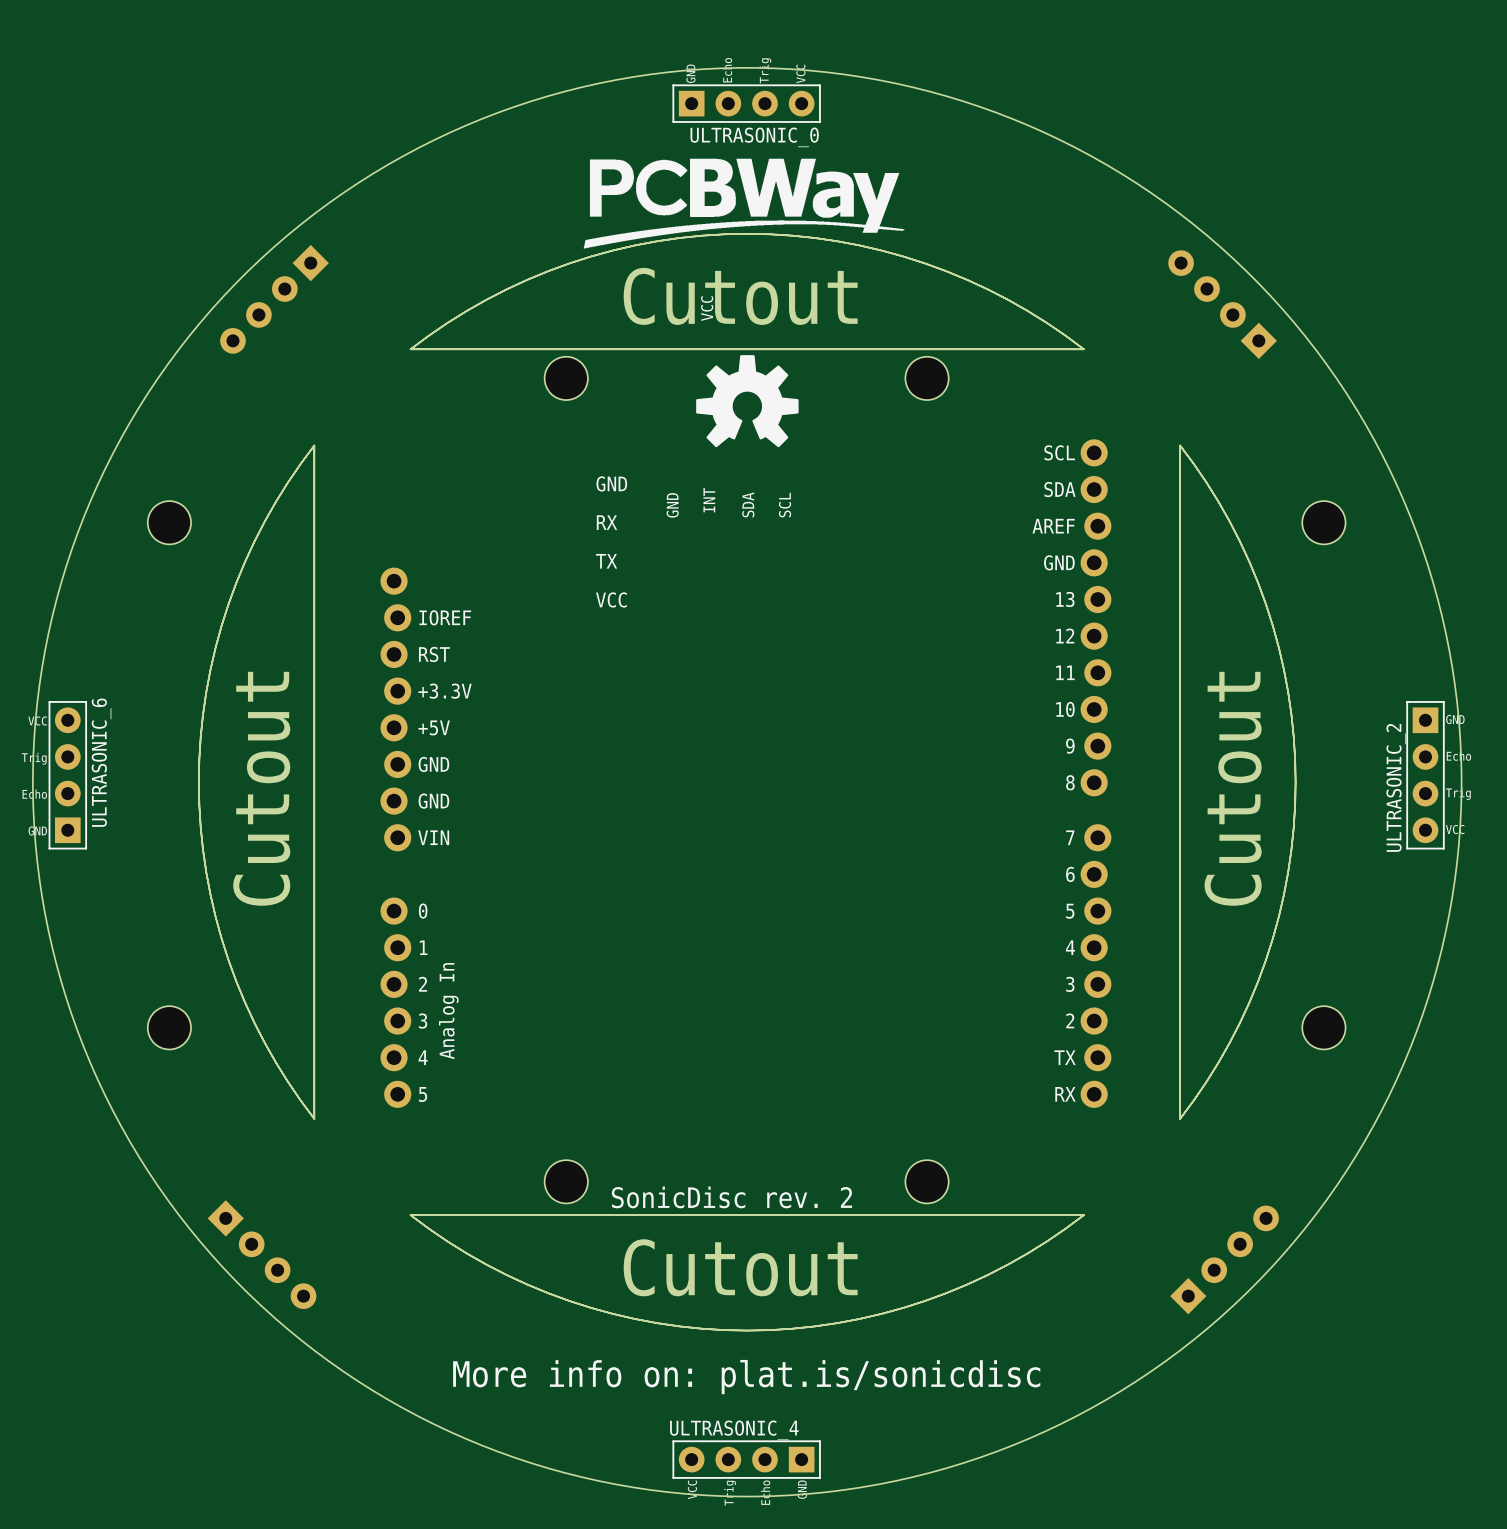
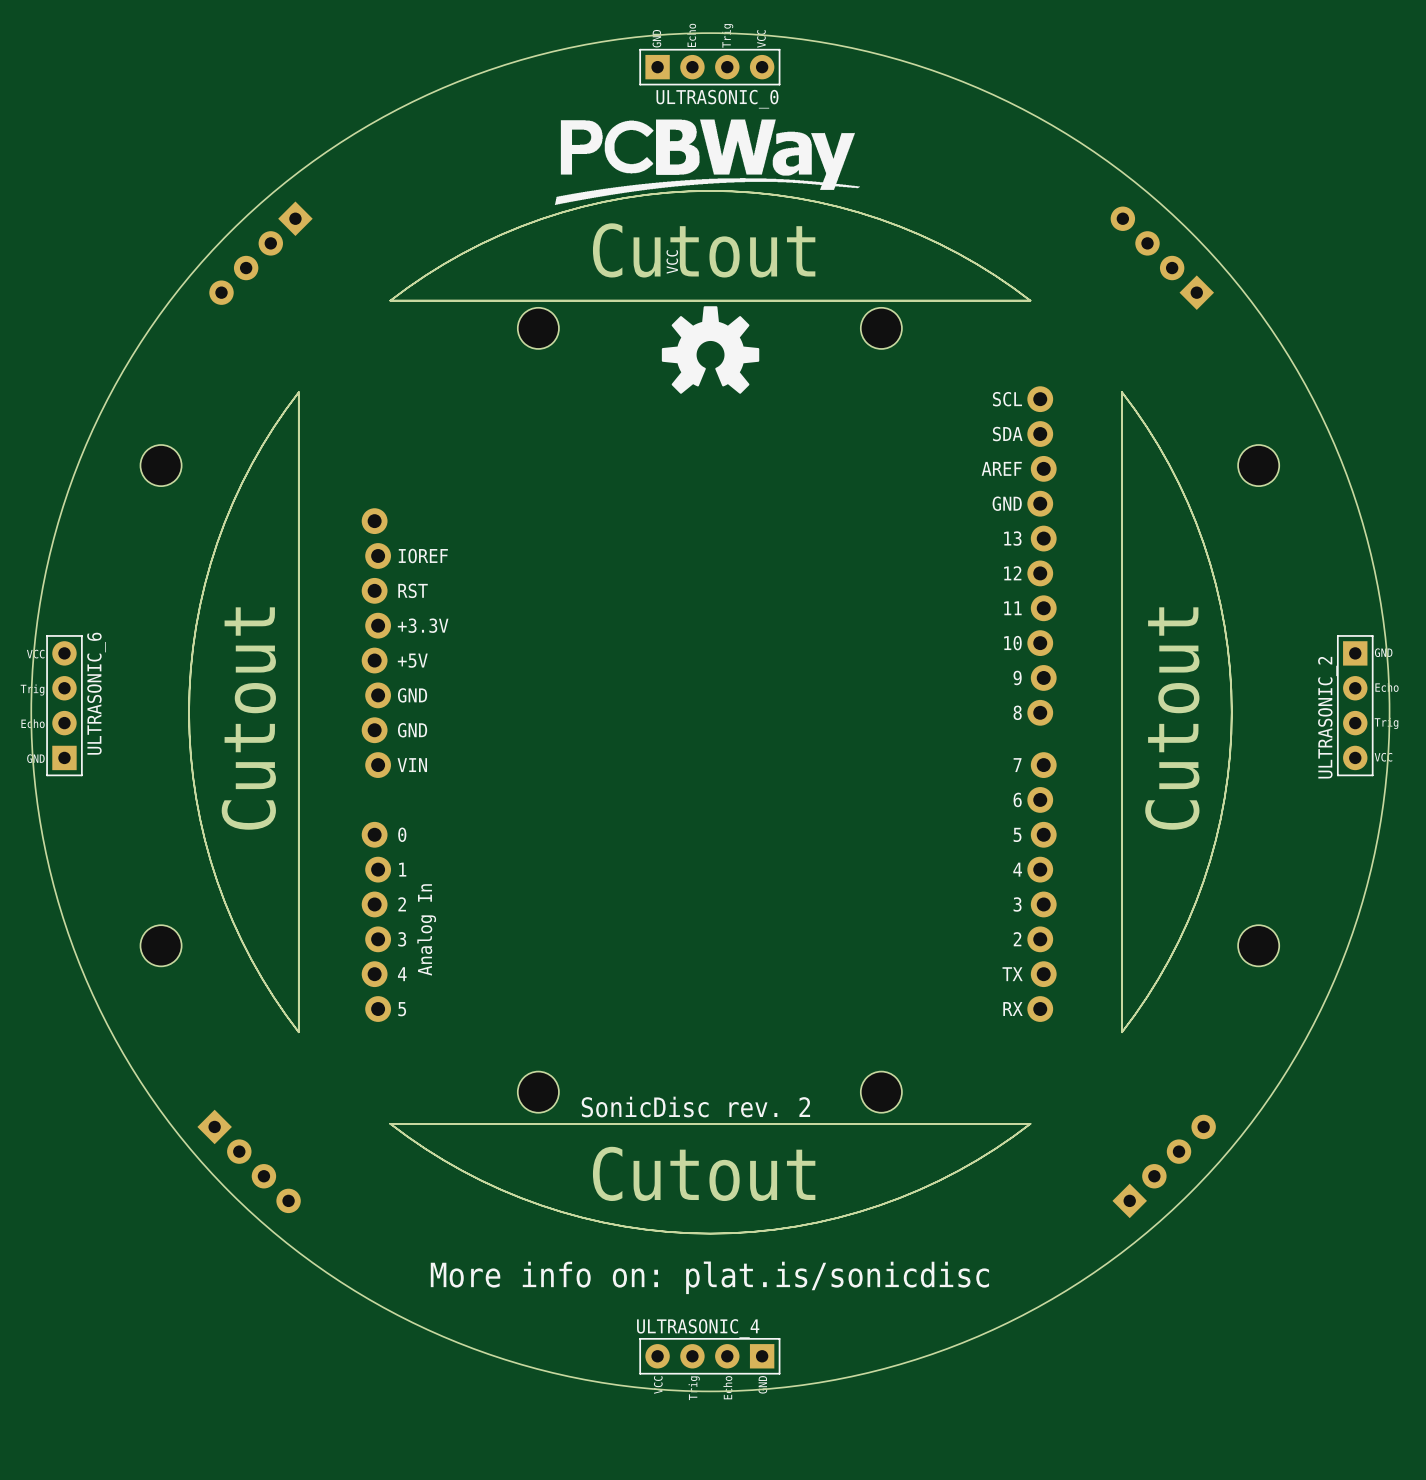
text: GND (611, 483) -> none
text: INT (709, 500) -> none
text: SDA (748, 504) -> none
text: GND (672, 505) -> none
text: SCL (785, 505) -> none
text: RX (607, 522) -> none
text: TX (606, 561) -> none
text: VCC (611, 599) -> none

